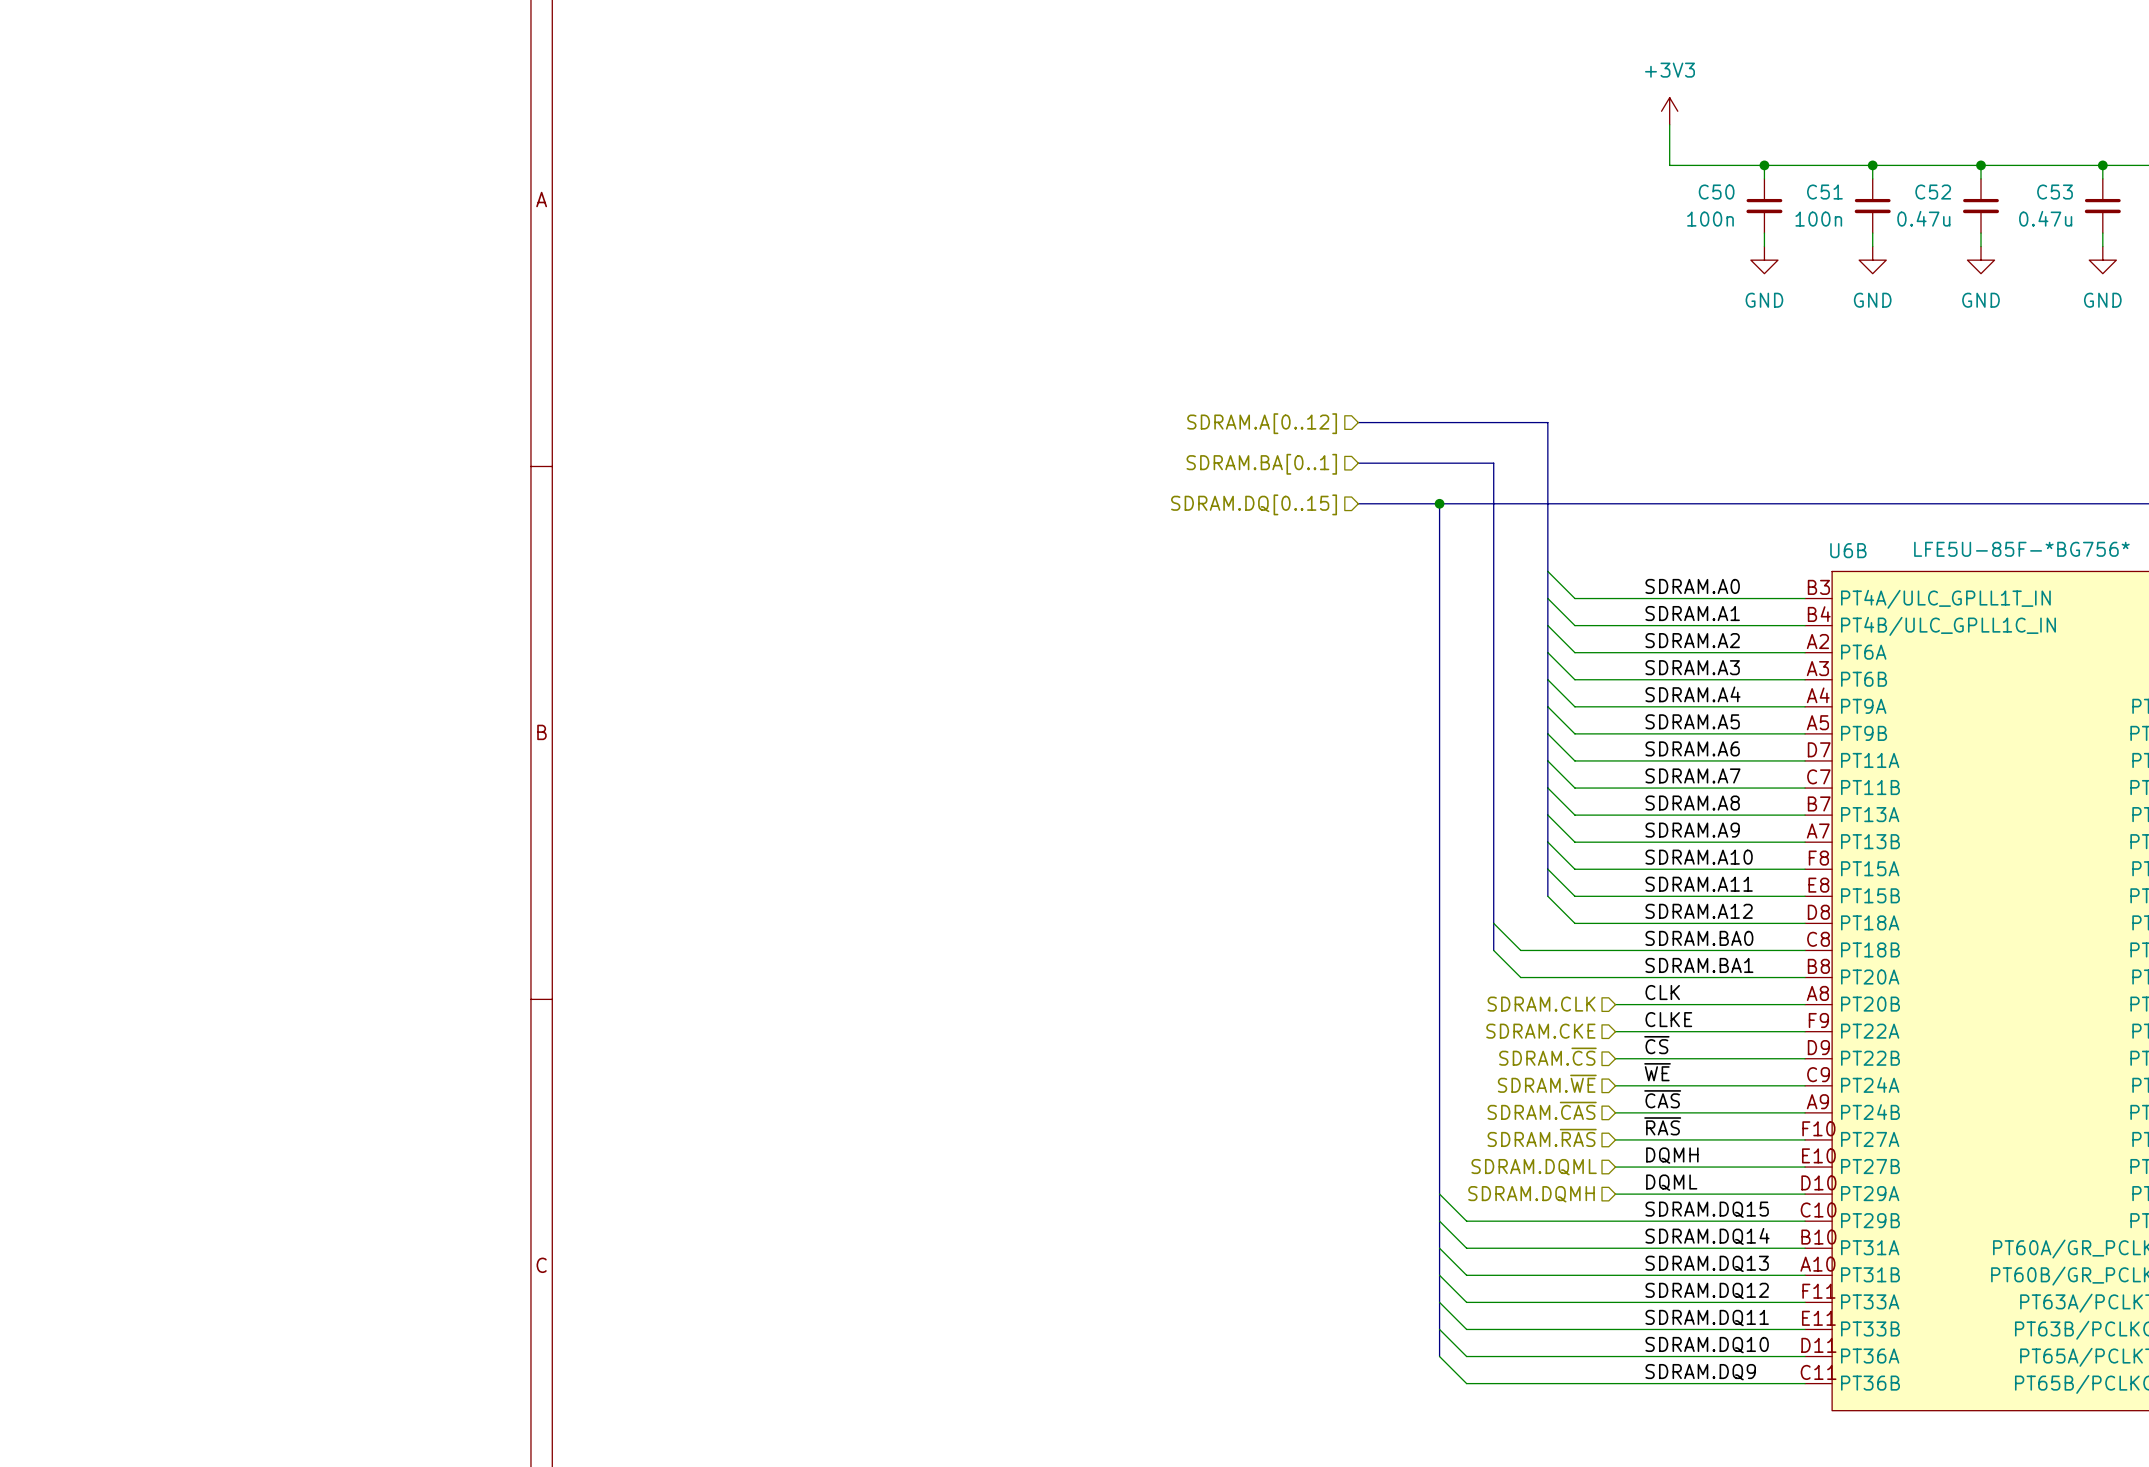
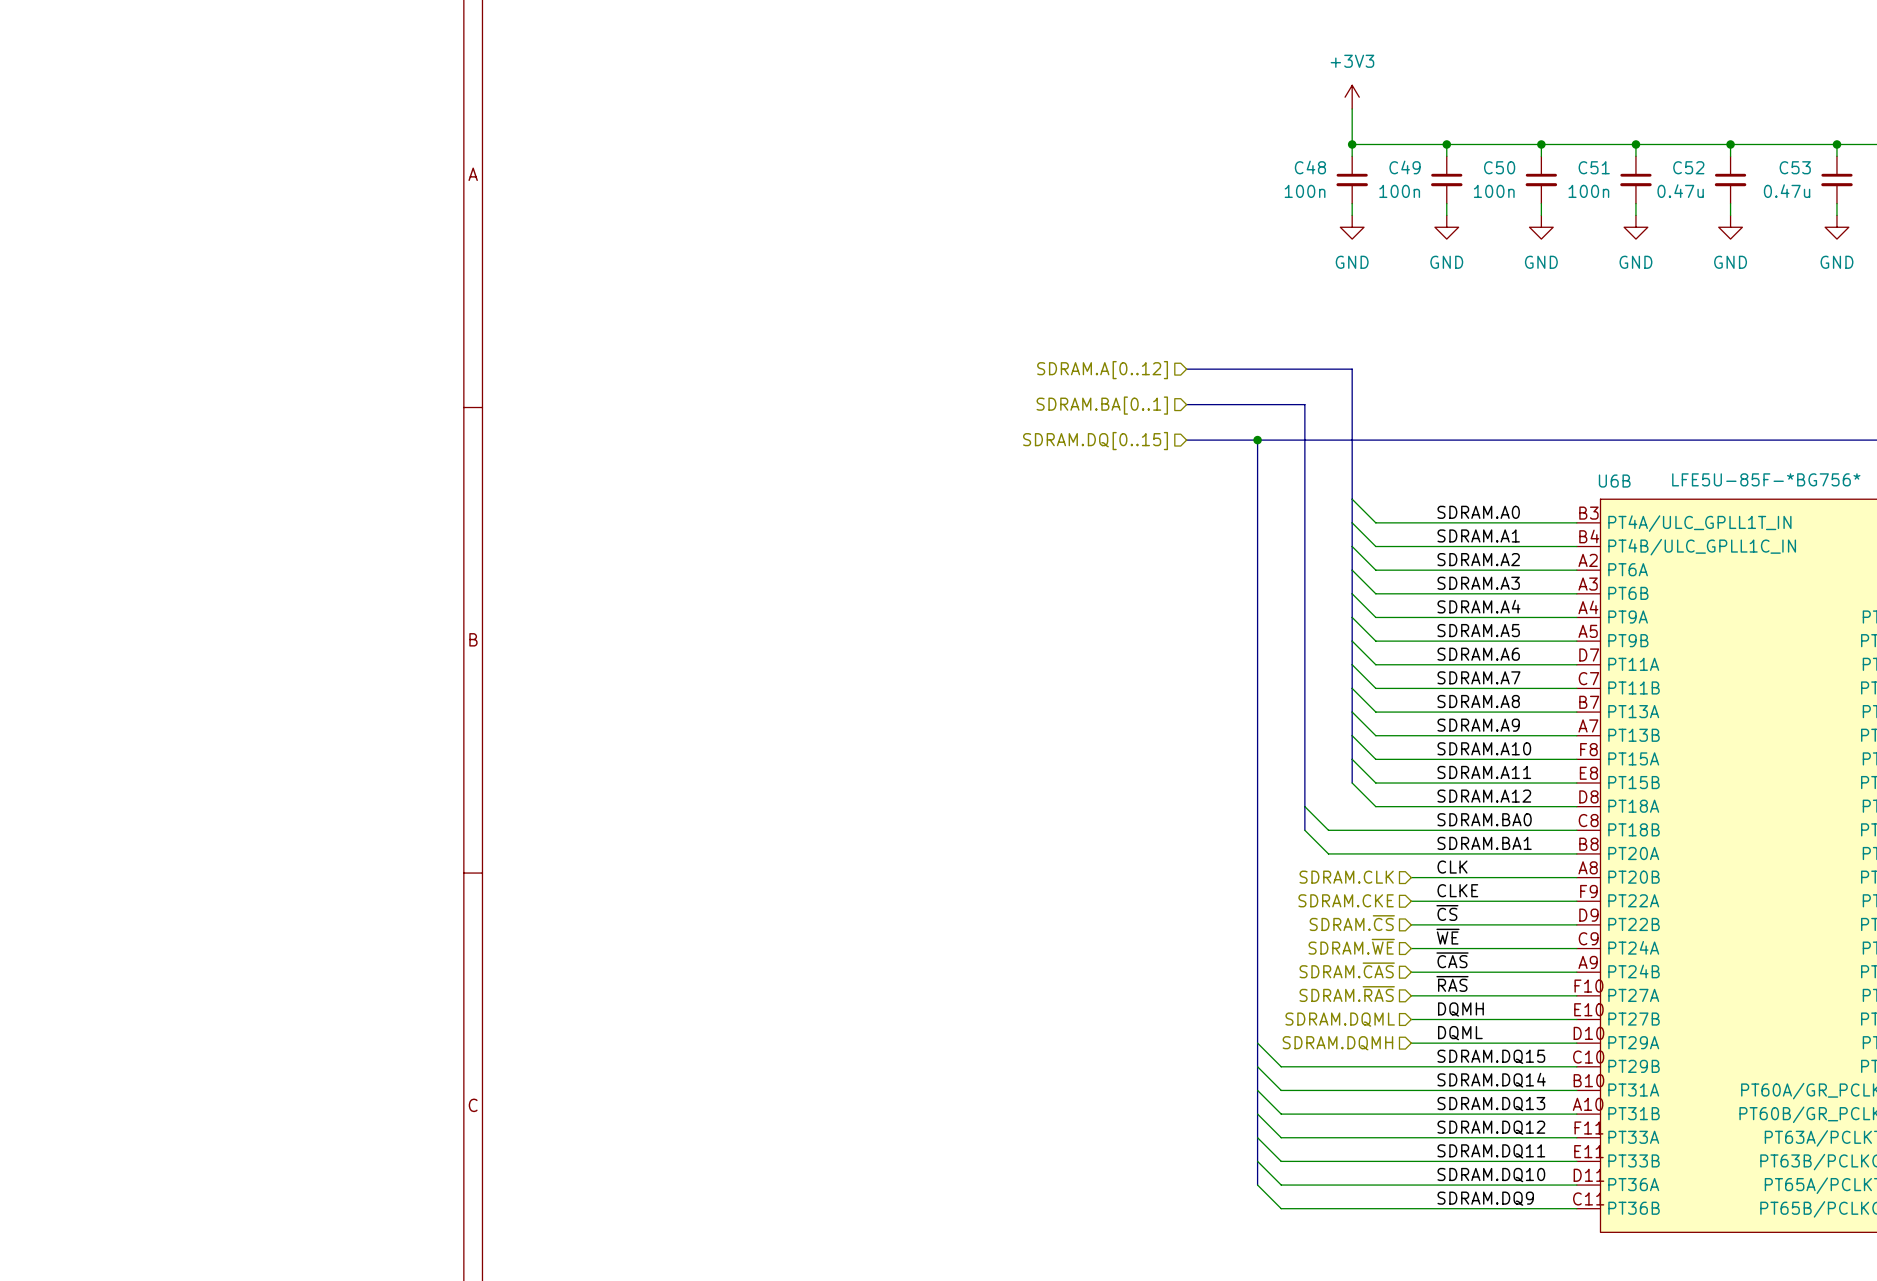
power symbol position: +3V3 (1669, 111) -> +3V3 (1352, 97)
wire: none -> (1352, 109) (1352, 156)
wire: (1669, 124) (1669, 165) -> (1352, 144) (1458, 144)
junction: none -> (1352, 144)
wire: none -> (1446, 144) (1446, 156)
junction: none -> (1446, 144)
C48: none -> 100n (1352, 179)
C49: none -> 100n (1446, 179)
wire: none -> (1352, 203) (1352, 215)
wire: none -> (1446, 203) (1446, 215)
power symbol: none -> GND (1352, 227)
power symbol: none -> GND (1446, 227)

